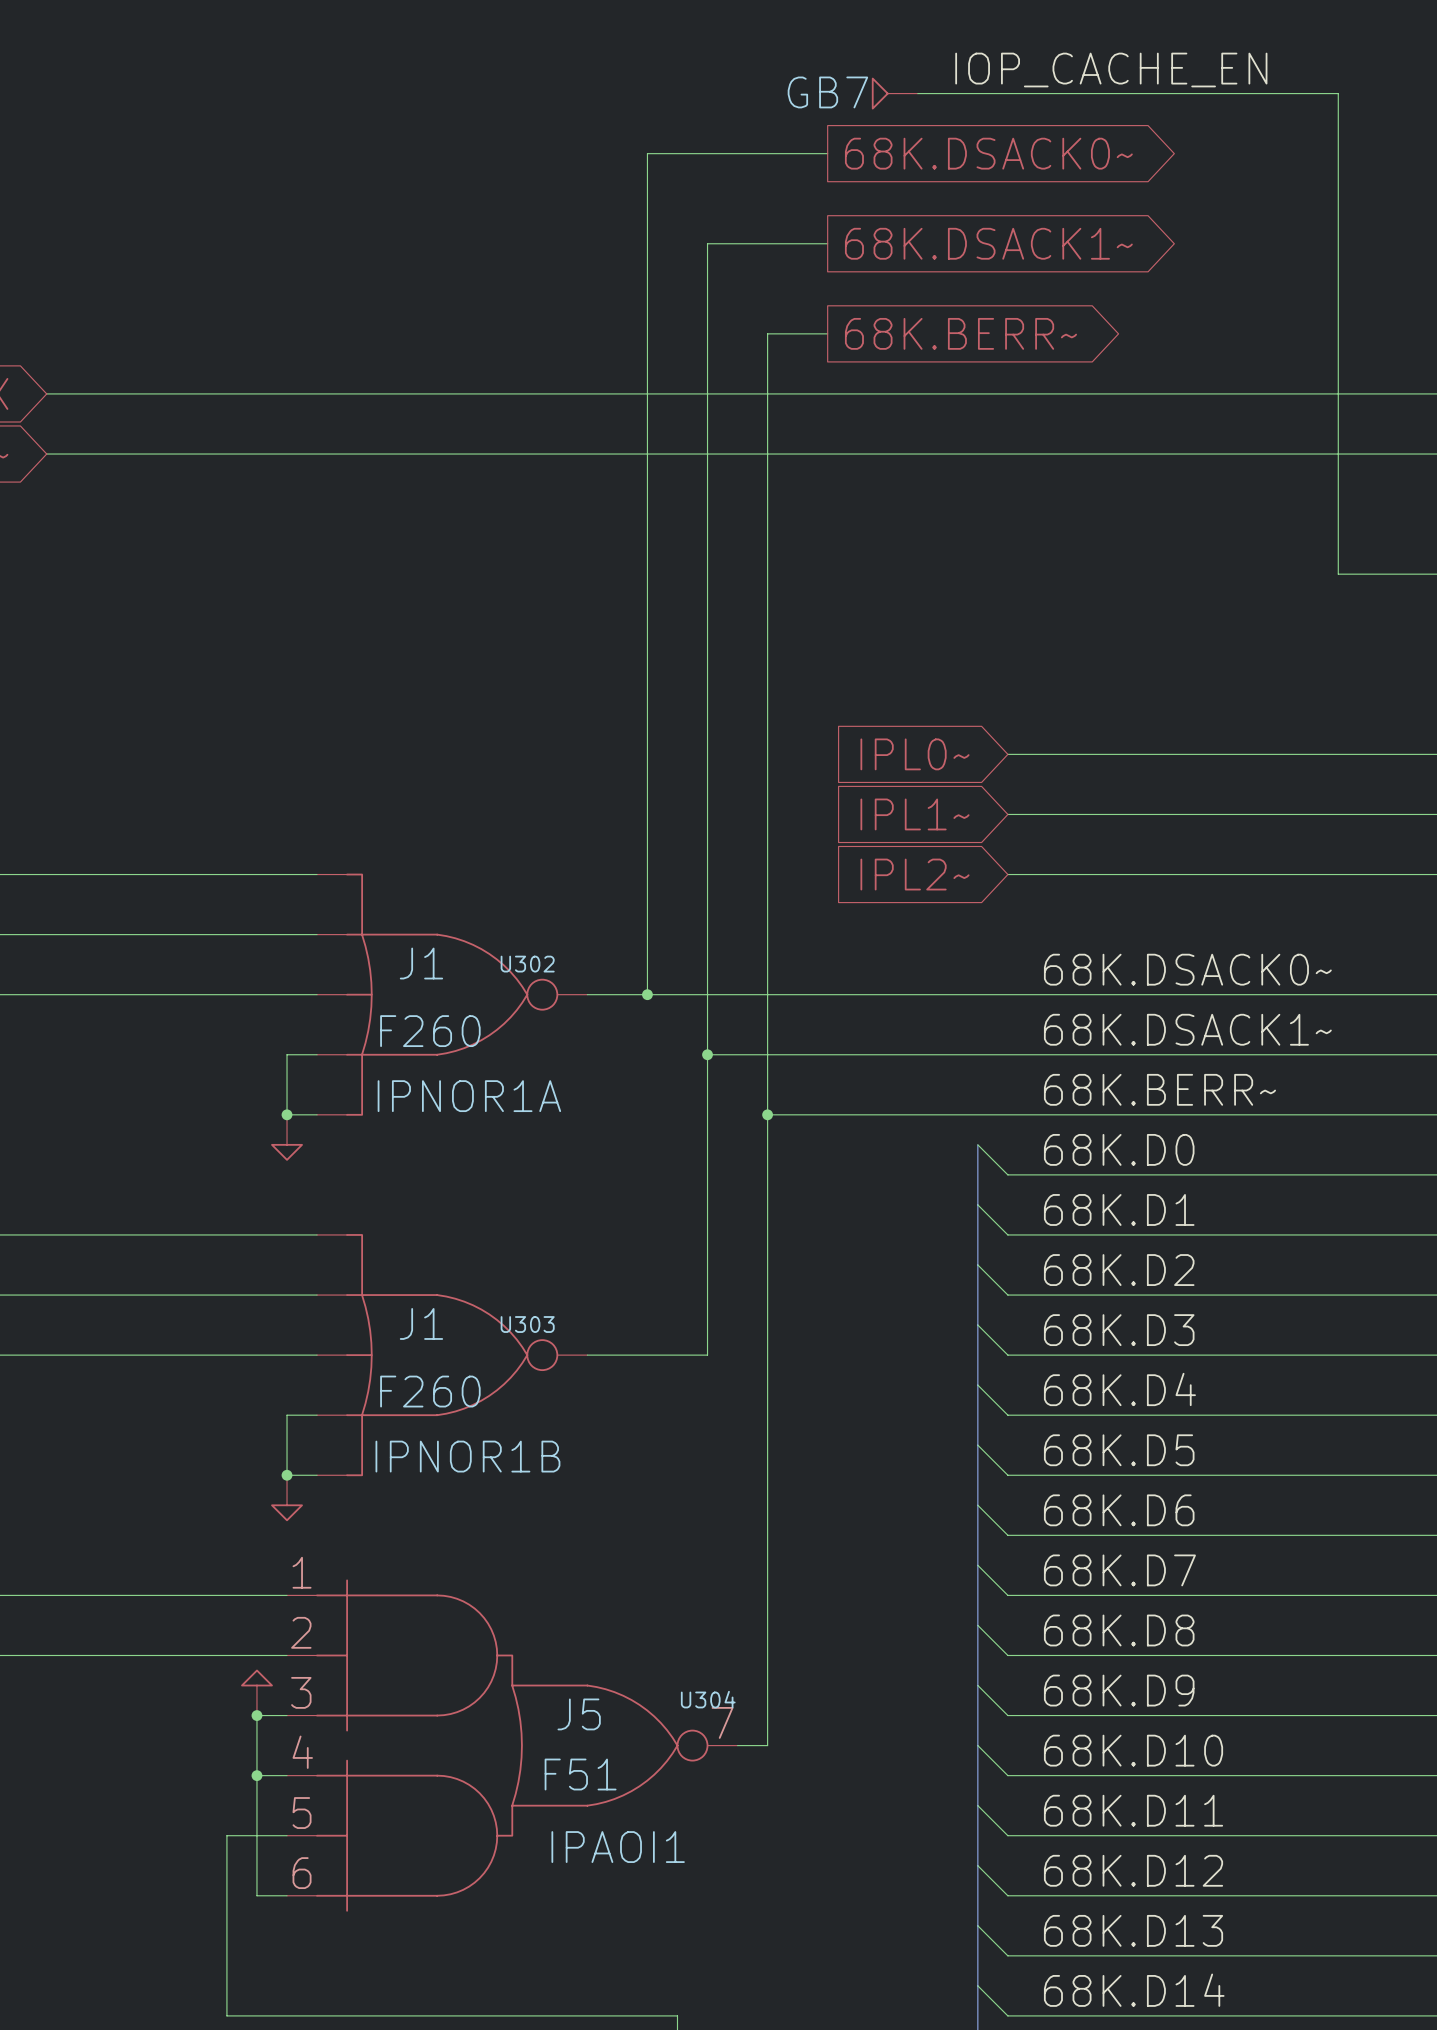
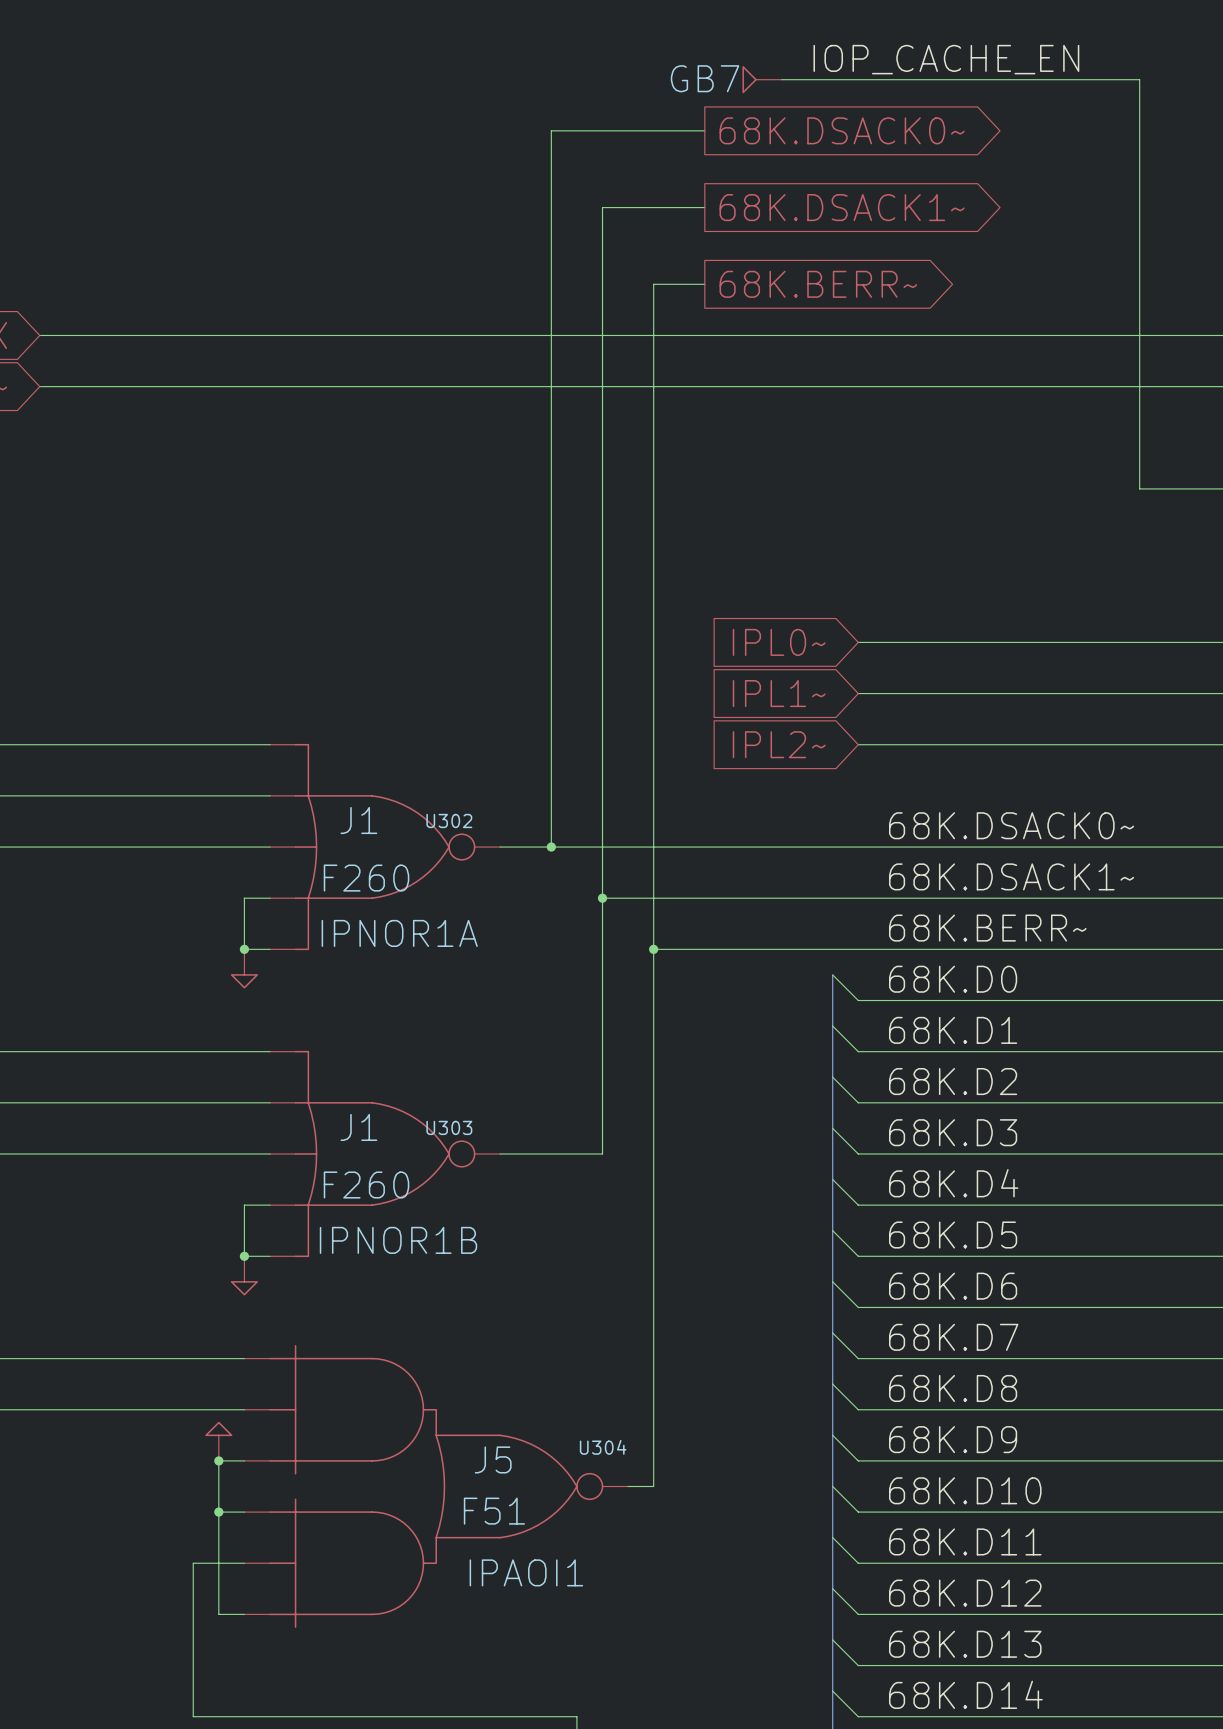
U304 pin number: 1 (302, 1572) -> none
U304 pin number: 2 (301, 1632) -> none
U304 pin number: 3 (301, 1692) -> none
U304 pin number: 7 (722, 1722) -> none
U304 pin number: 4 (302, 1752) -> none
U304 pin number: 5 (302, 1813) -> none
U304 pin number: 6 (302, 1873) -> none

